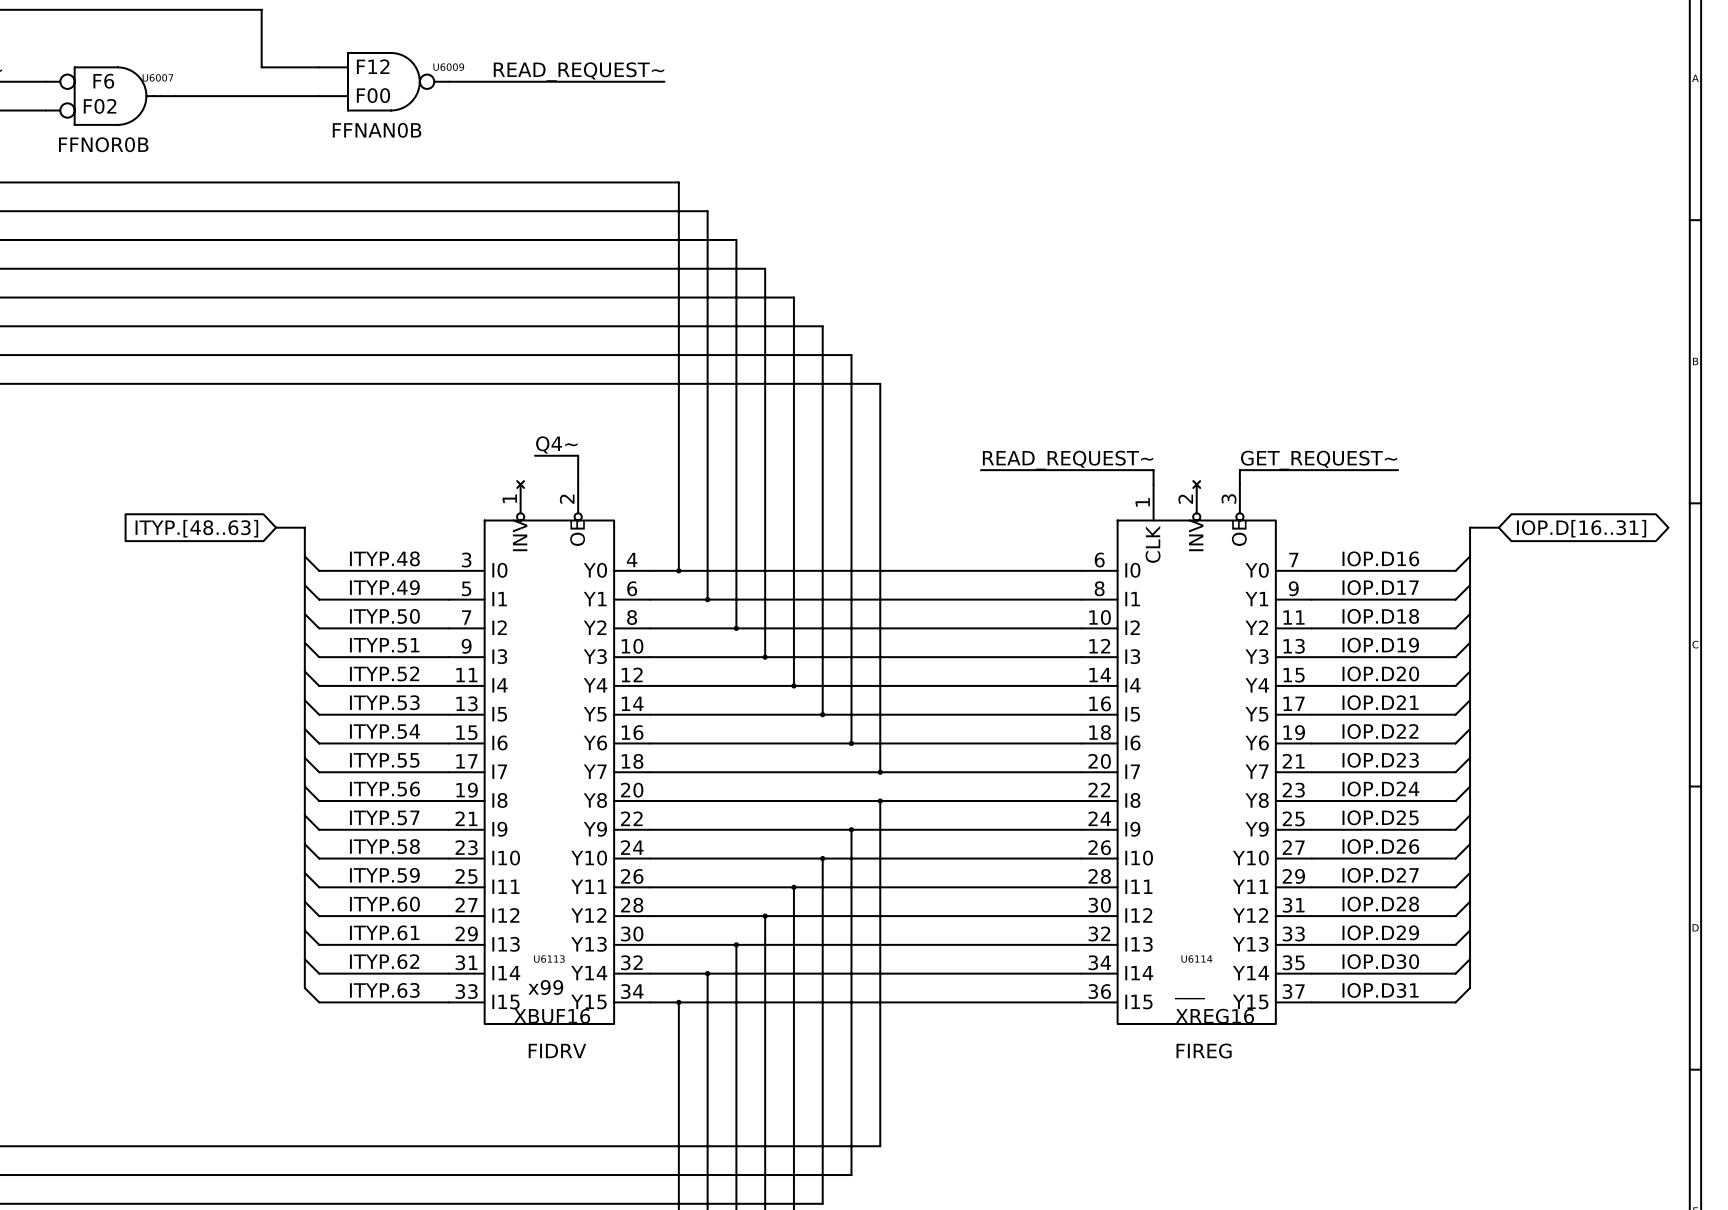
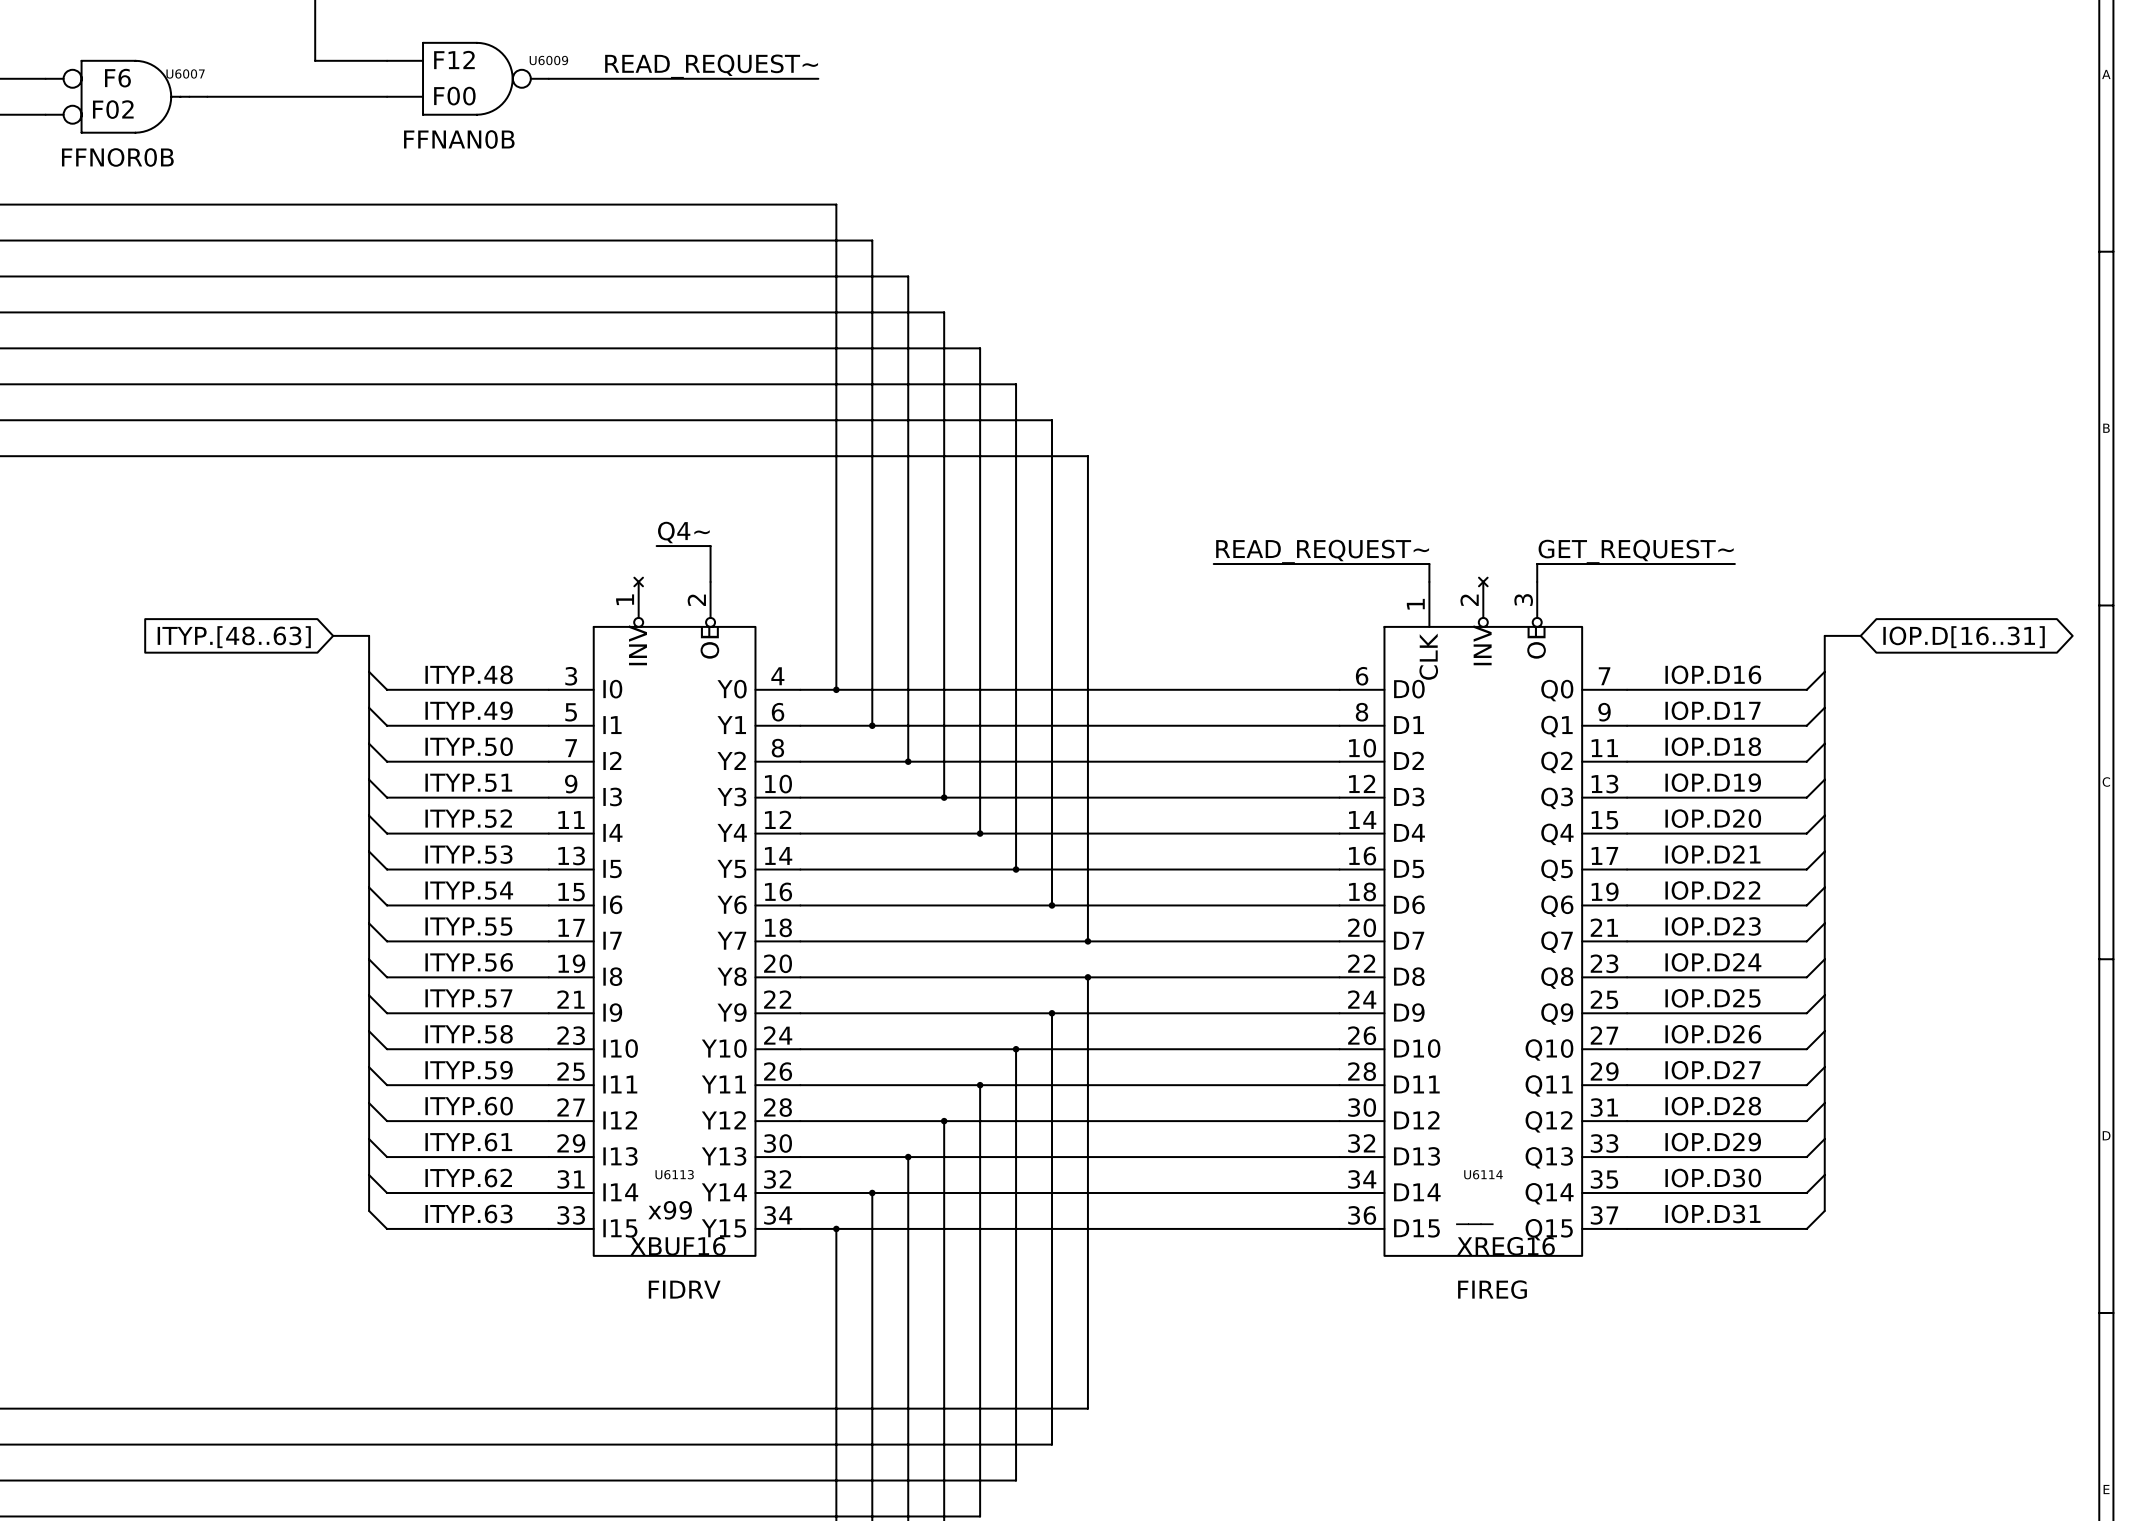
U6114 symbol: [1081, 484, 1312, 1024] -> [1339, 581, 1628, 1256]

